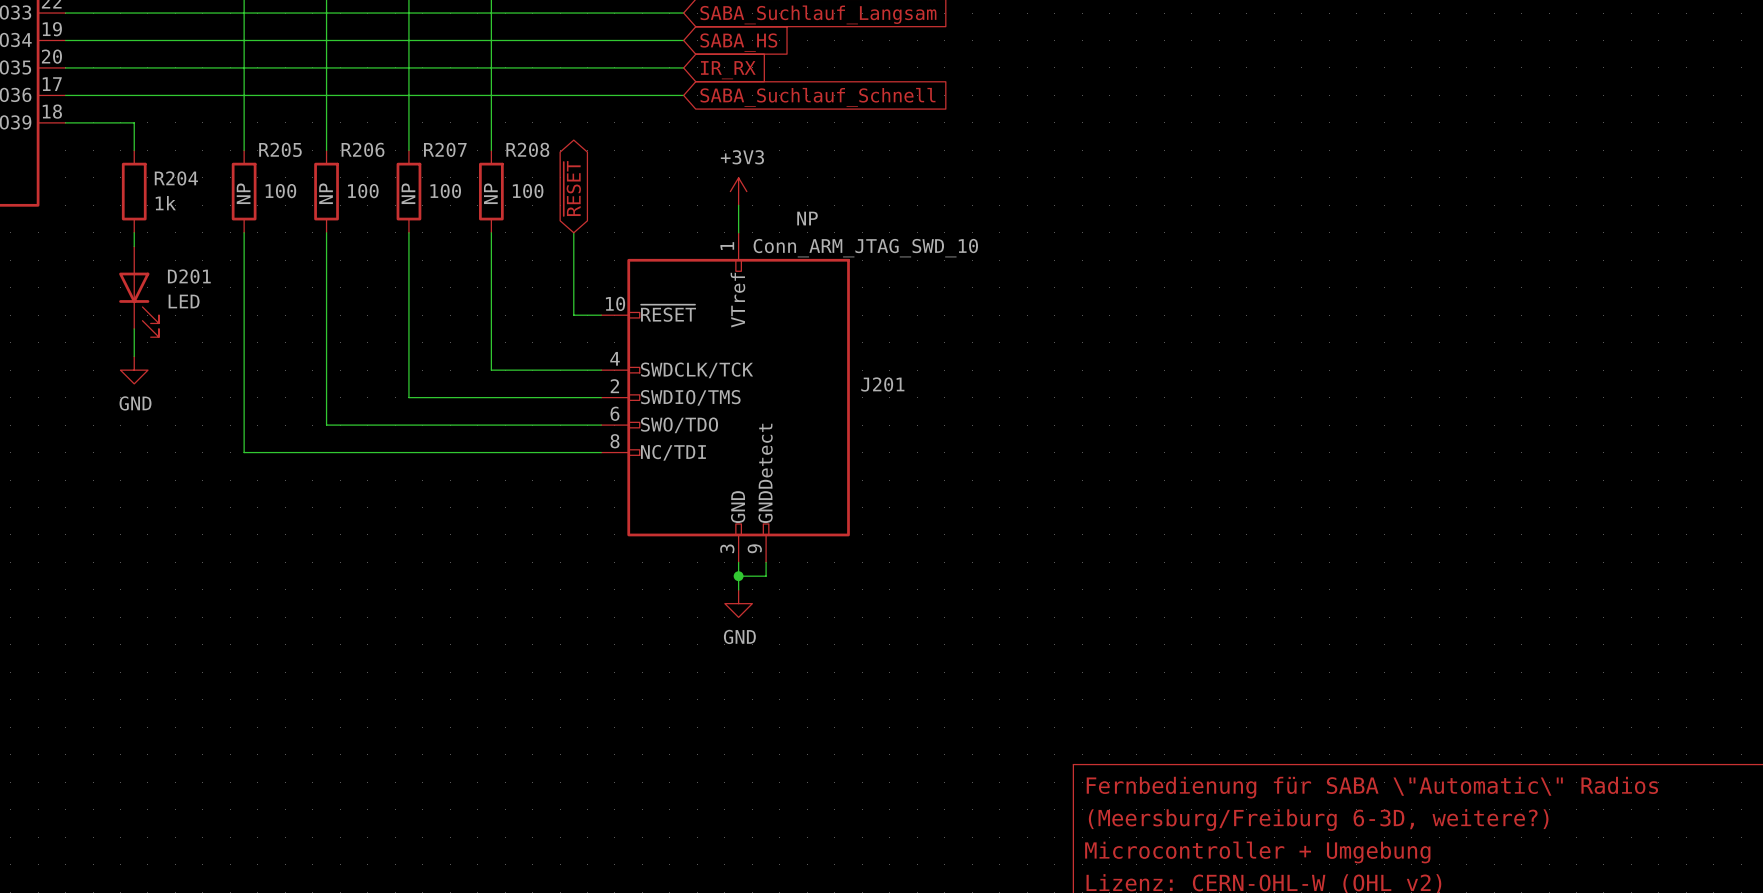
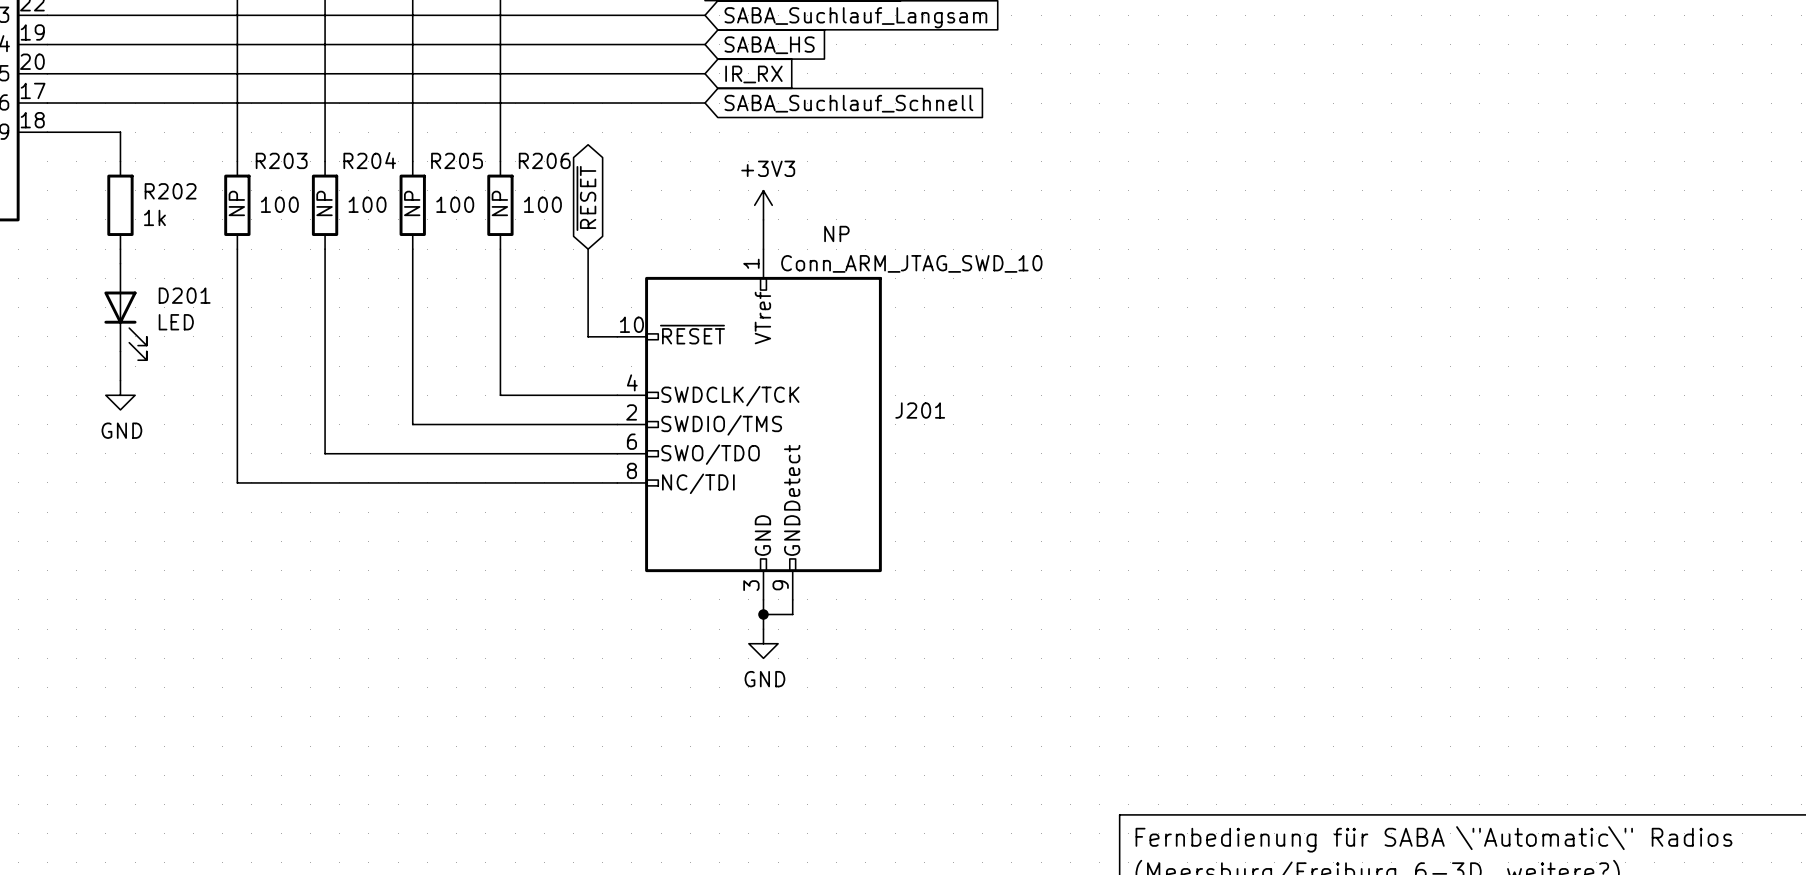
R205 name: R205 (280, 149) -> R203 (281, 160)
R206 name: R206 (363, 149) -> R204 (369, 160)
R207 name: R207 (445, 149) -> R205 (457, 160)
R208 name: R208 (527, 149) -> R206 (544, 160)
R204 name: R204 (176, 178) -> R202 (170, 191)

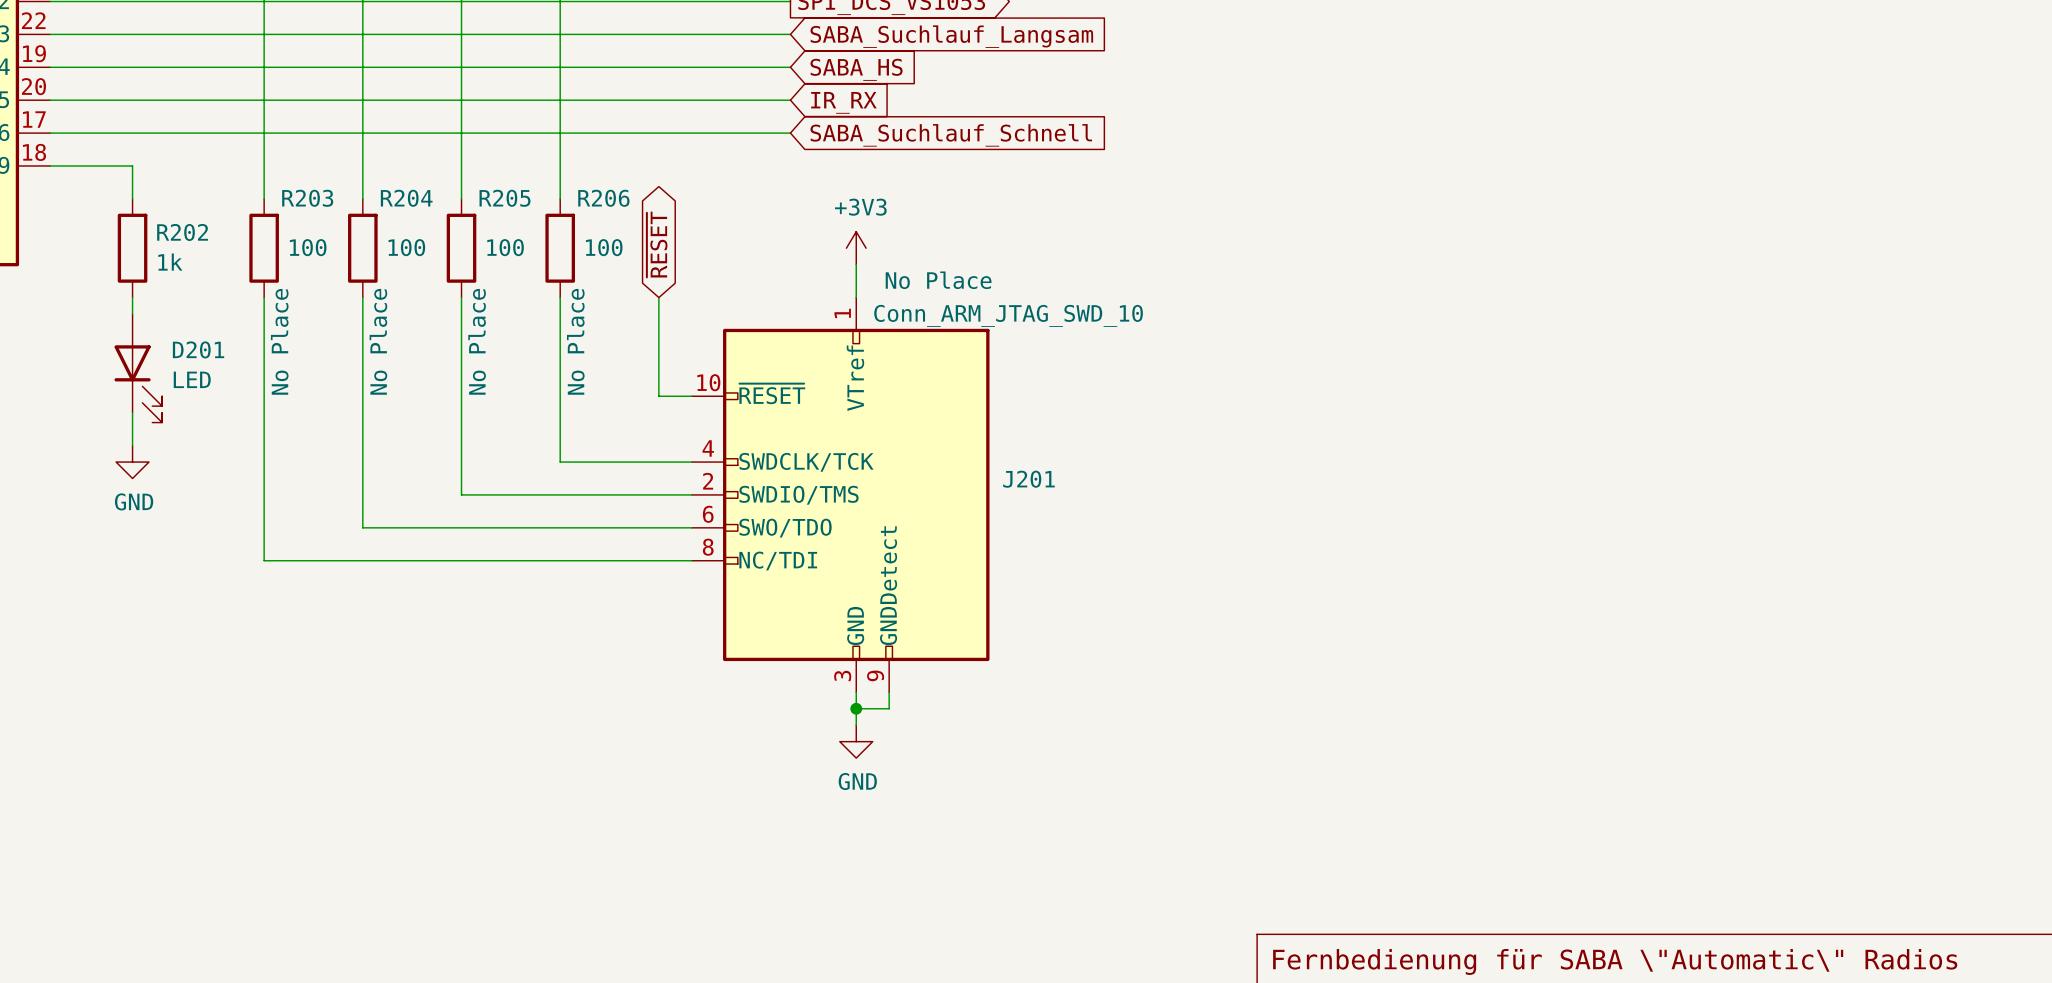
R203 text: NP (236, 203) -> No Place (279, 341)
R204 text: NP (324, 203) -> No Place (378, 341)
R205 text: NP (412, 203) -> No Place (477, 341)
R206 text: NP (499, 203) -> No Place (575, 341)
J201 text: NP (836, 233) -> No Place (938, 280)

